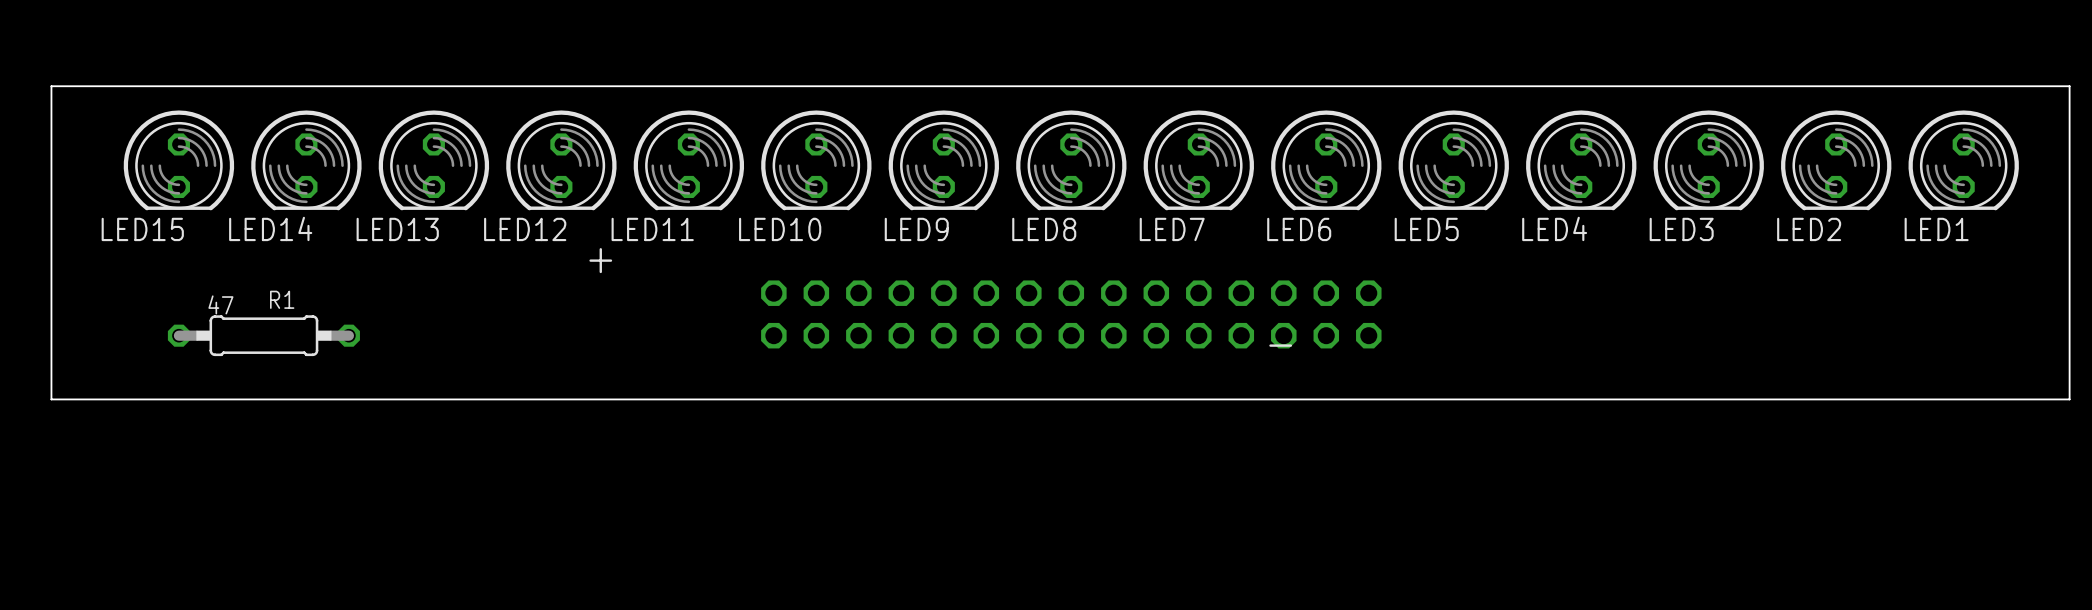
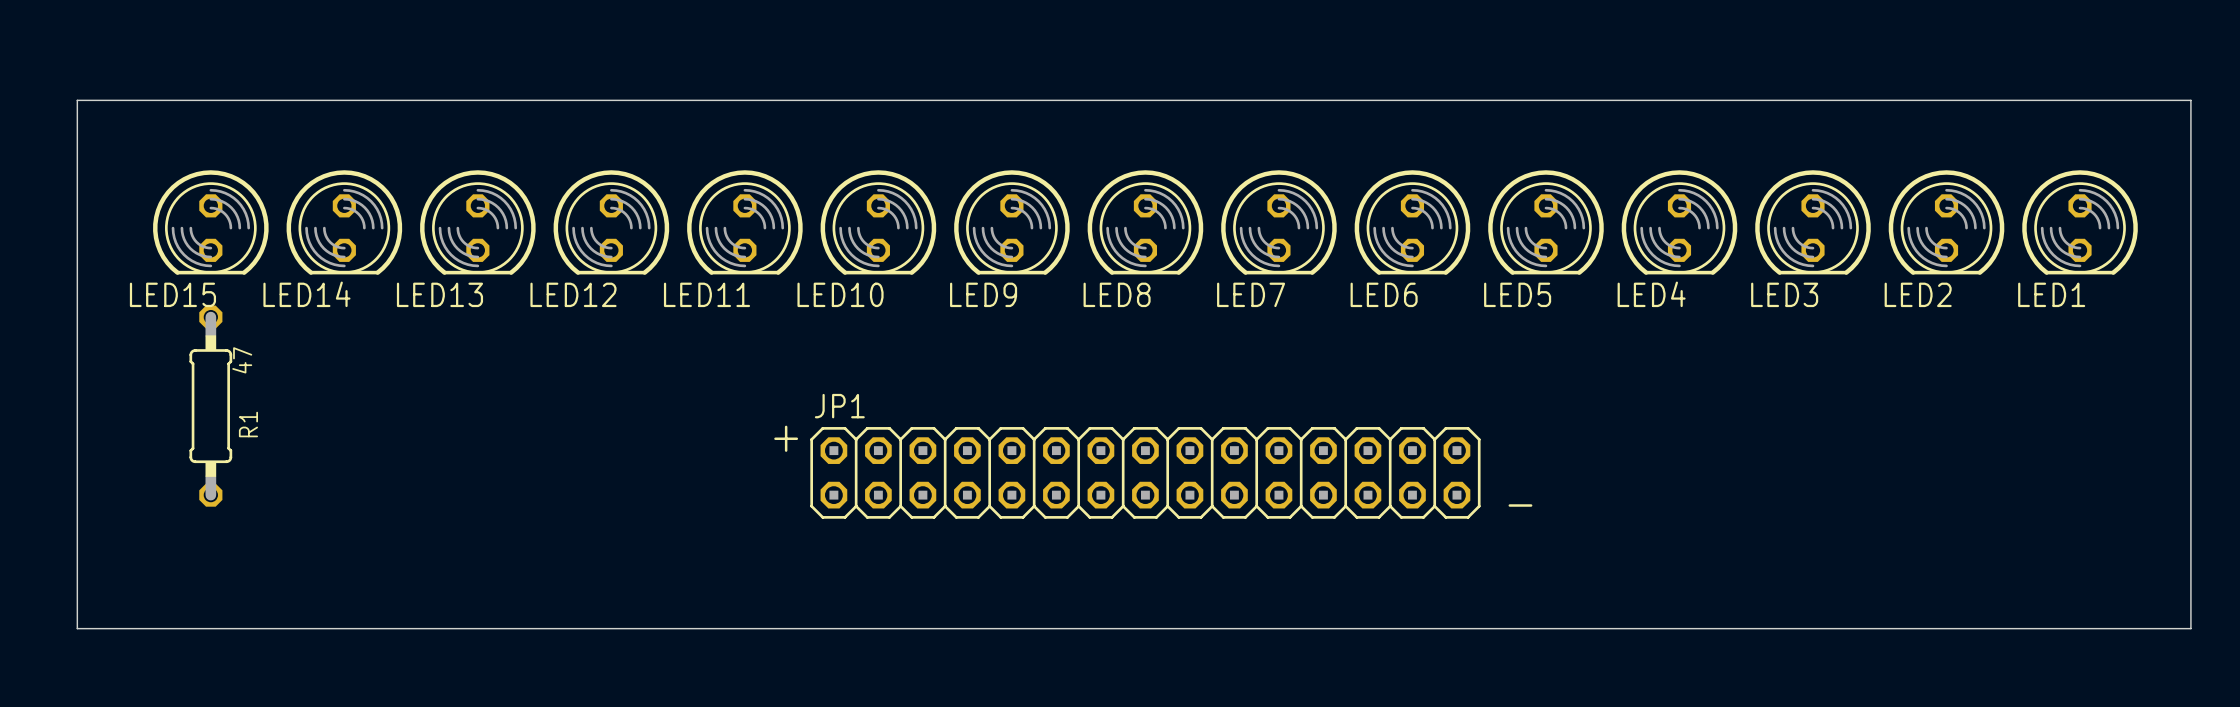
board edge: (51, 86) (2069, 86) -> (77, 144) (77, 100) (2190, 100) (2190, 144)
text position: + (600, 260) -> + (786, 438)
part: (1071, 314) -> none
R1 rotation: 0° (263, 335) -> 90° clockwise (210, 406)
text position: - (1280, 345) -> - (1520, 505)
board edge: (51, 399) (2069, 399) -> (77, 472) (77, 628) (2190, 628) (2190, 472)
JP1: none -> (1145, 472)

